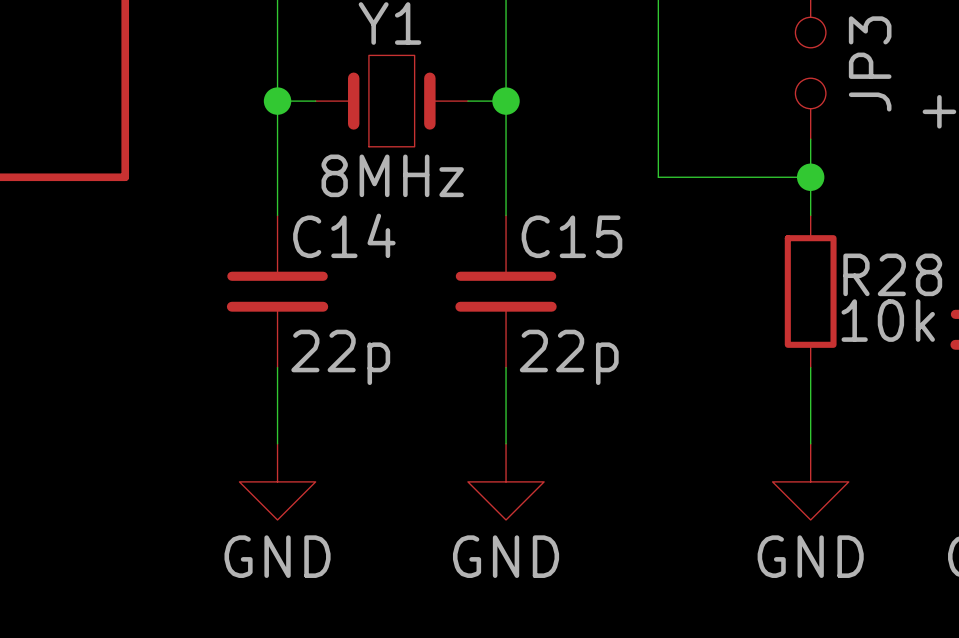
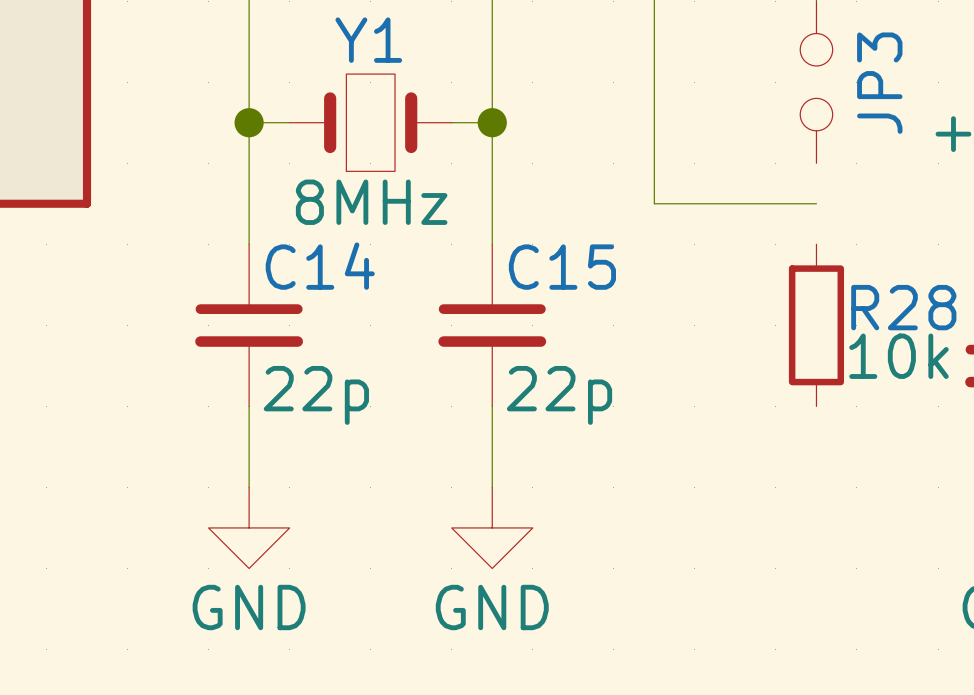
wire: (810, 139) (810, 215) -> none
junction: (810, 177) -> none
wire: (810, 367) (810, 443) -> none
power symbol: GND (810, 481) -> none

